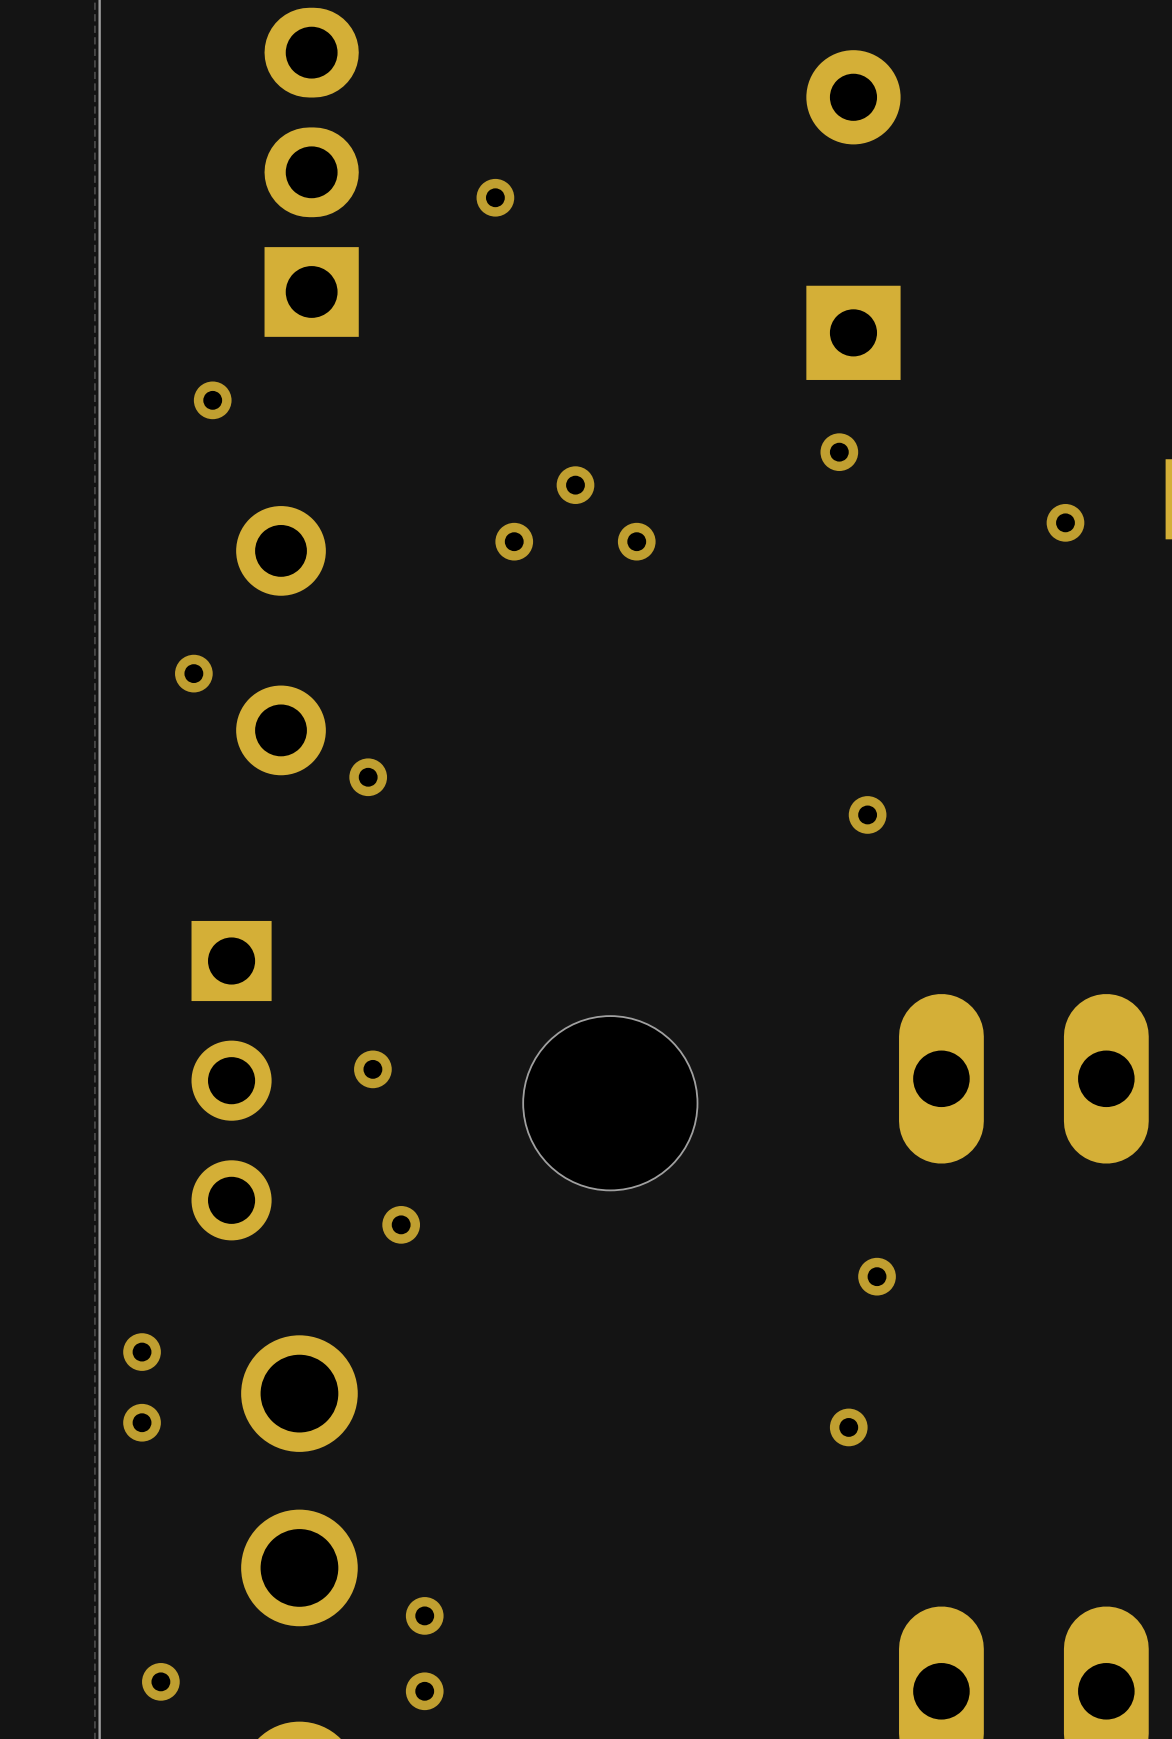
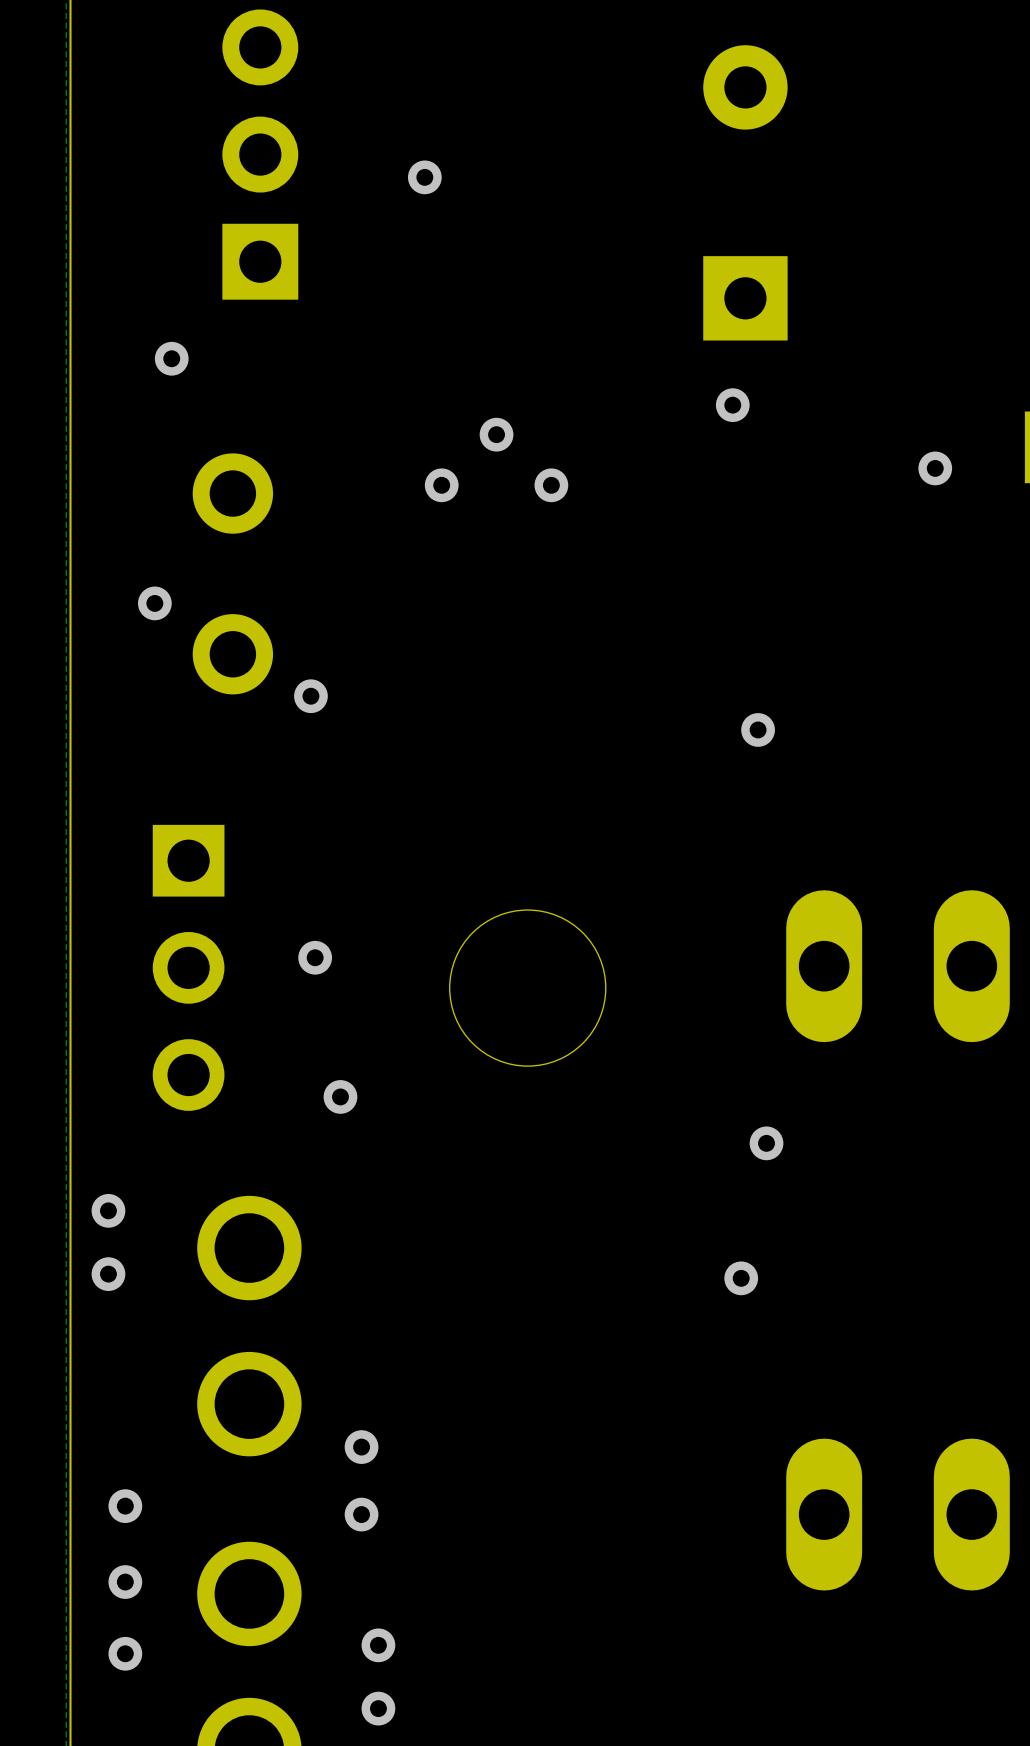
part footprint: [264, 7, 359, 337] -> [222, 9, 299, 300]

